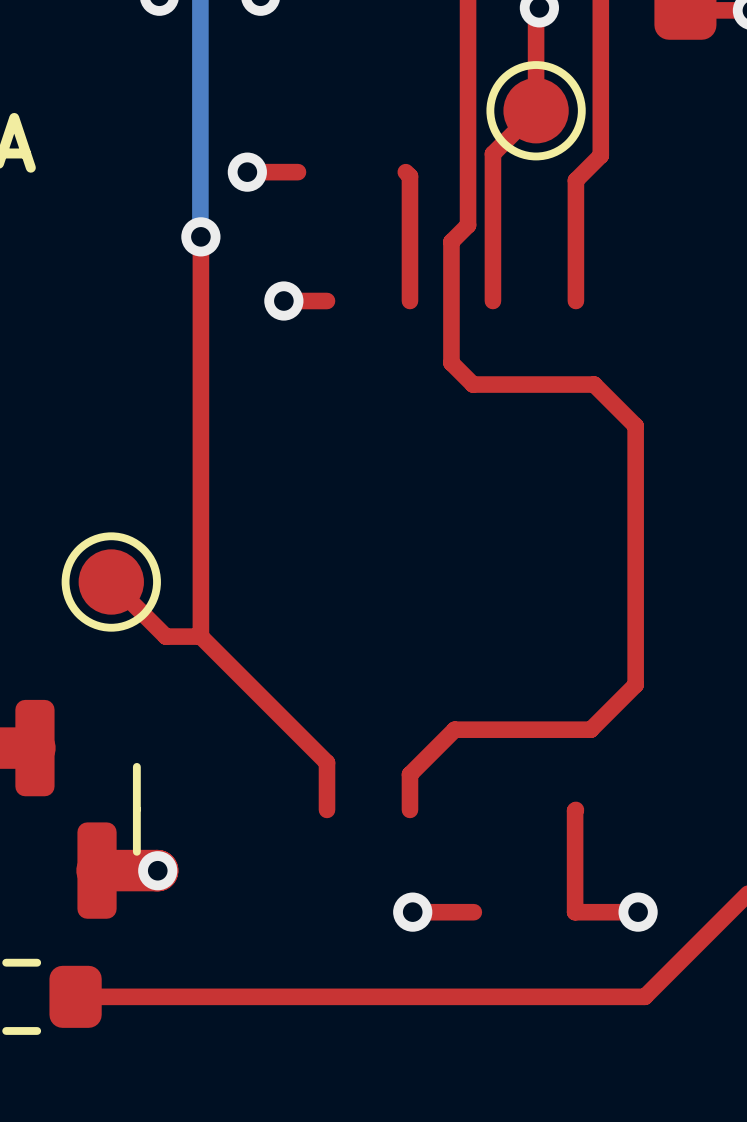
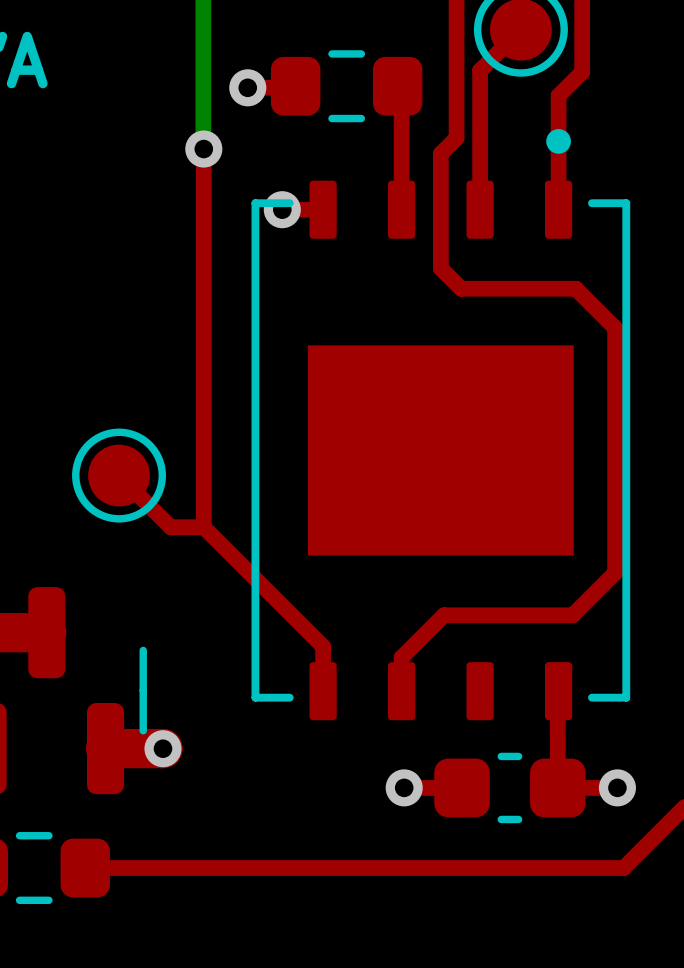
part: none -> (346, 86)
part: none -> (440, 424)
part: none -> (509, 787)

